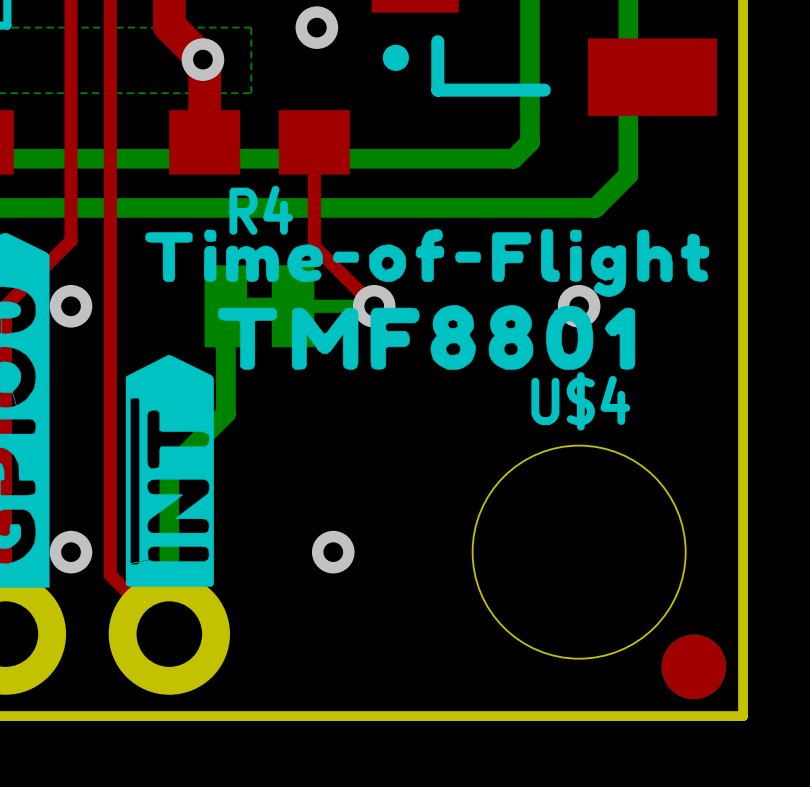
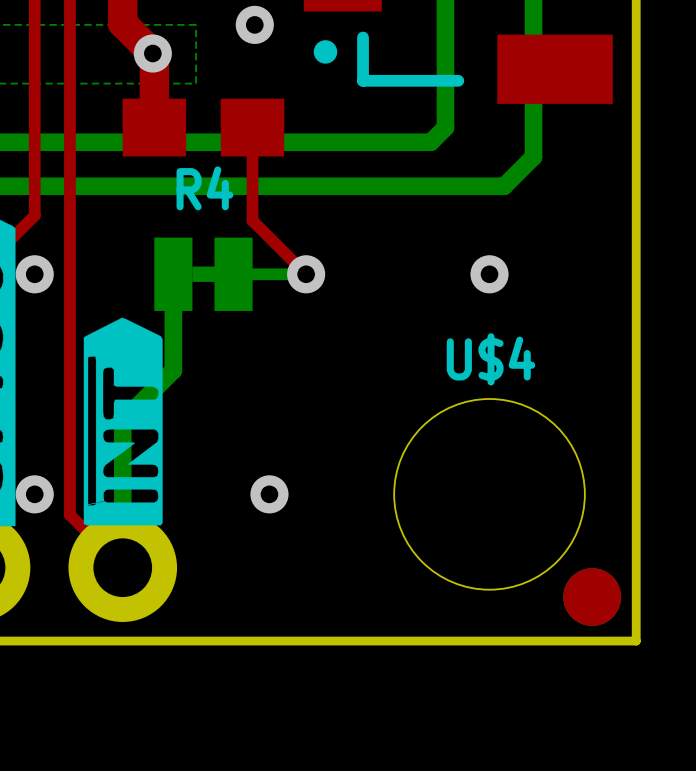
drawing: [145, 229, 710, 370] -> none

